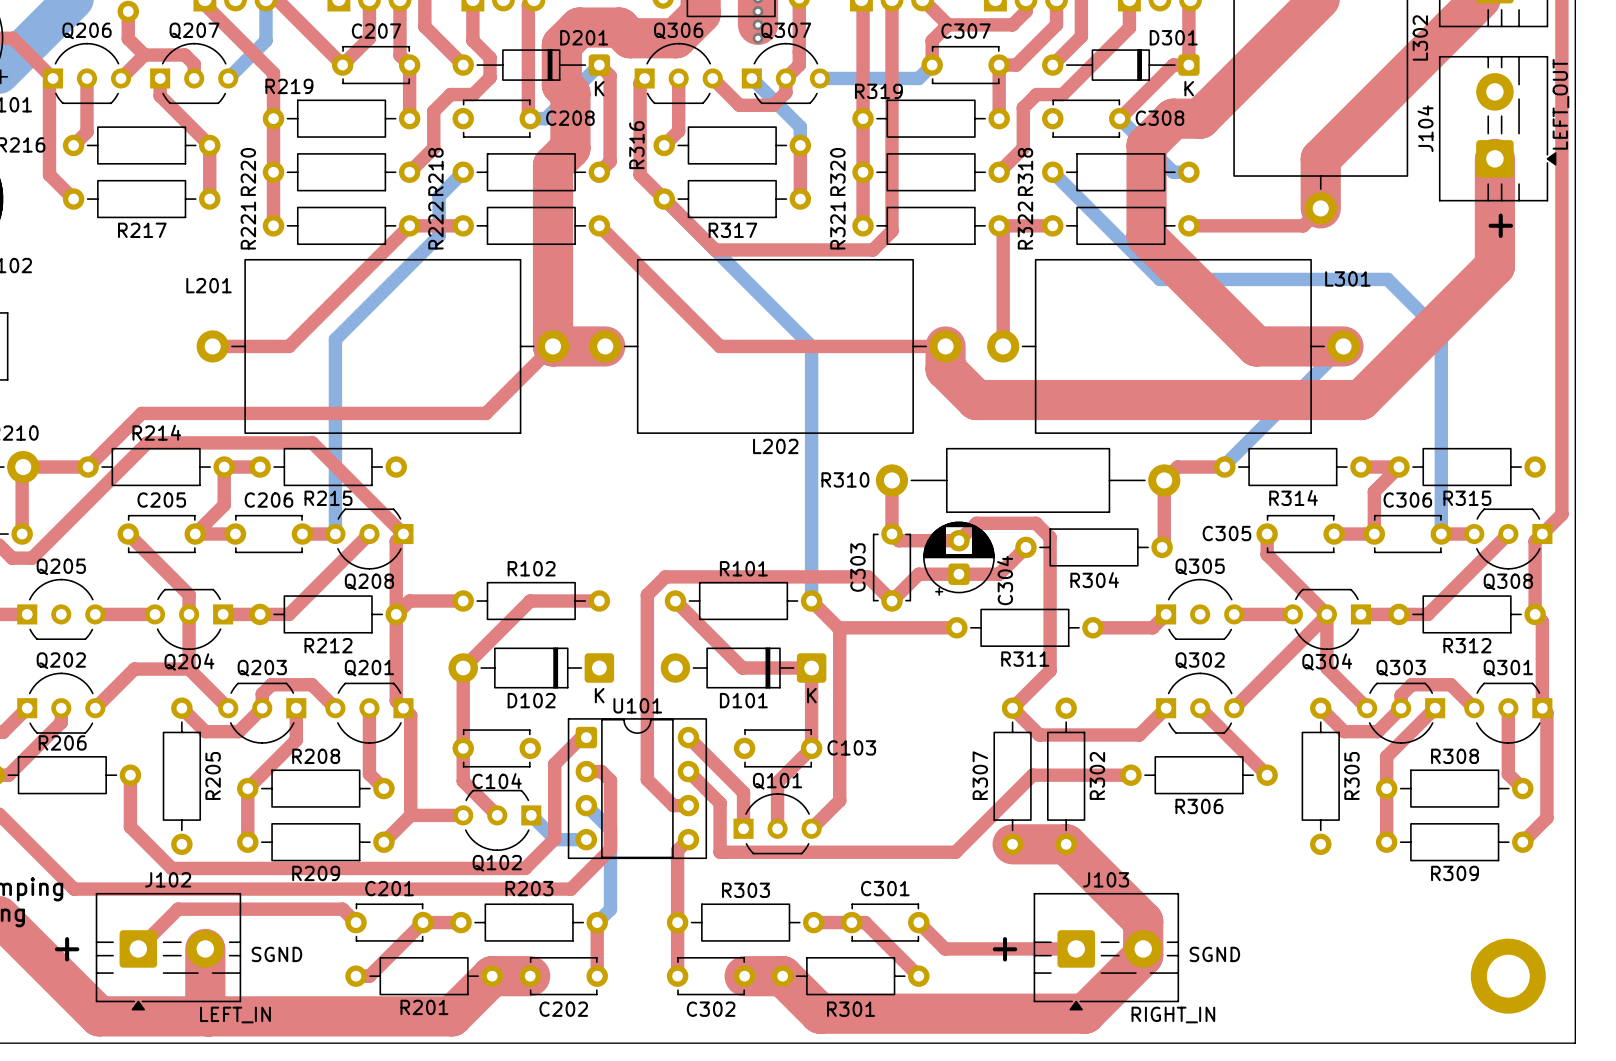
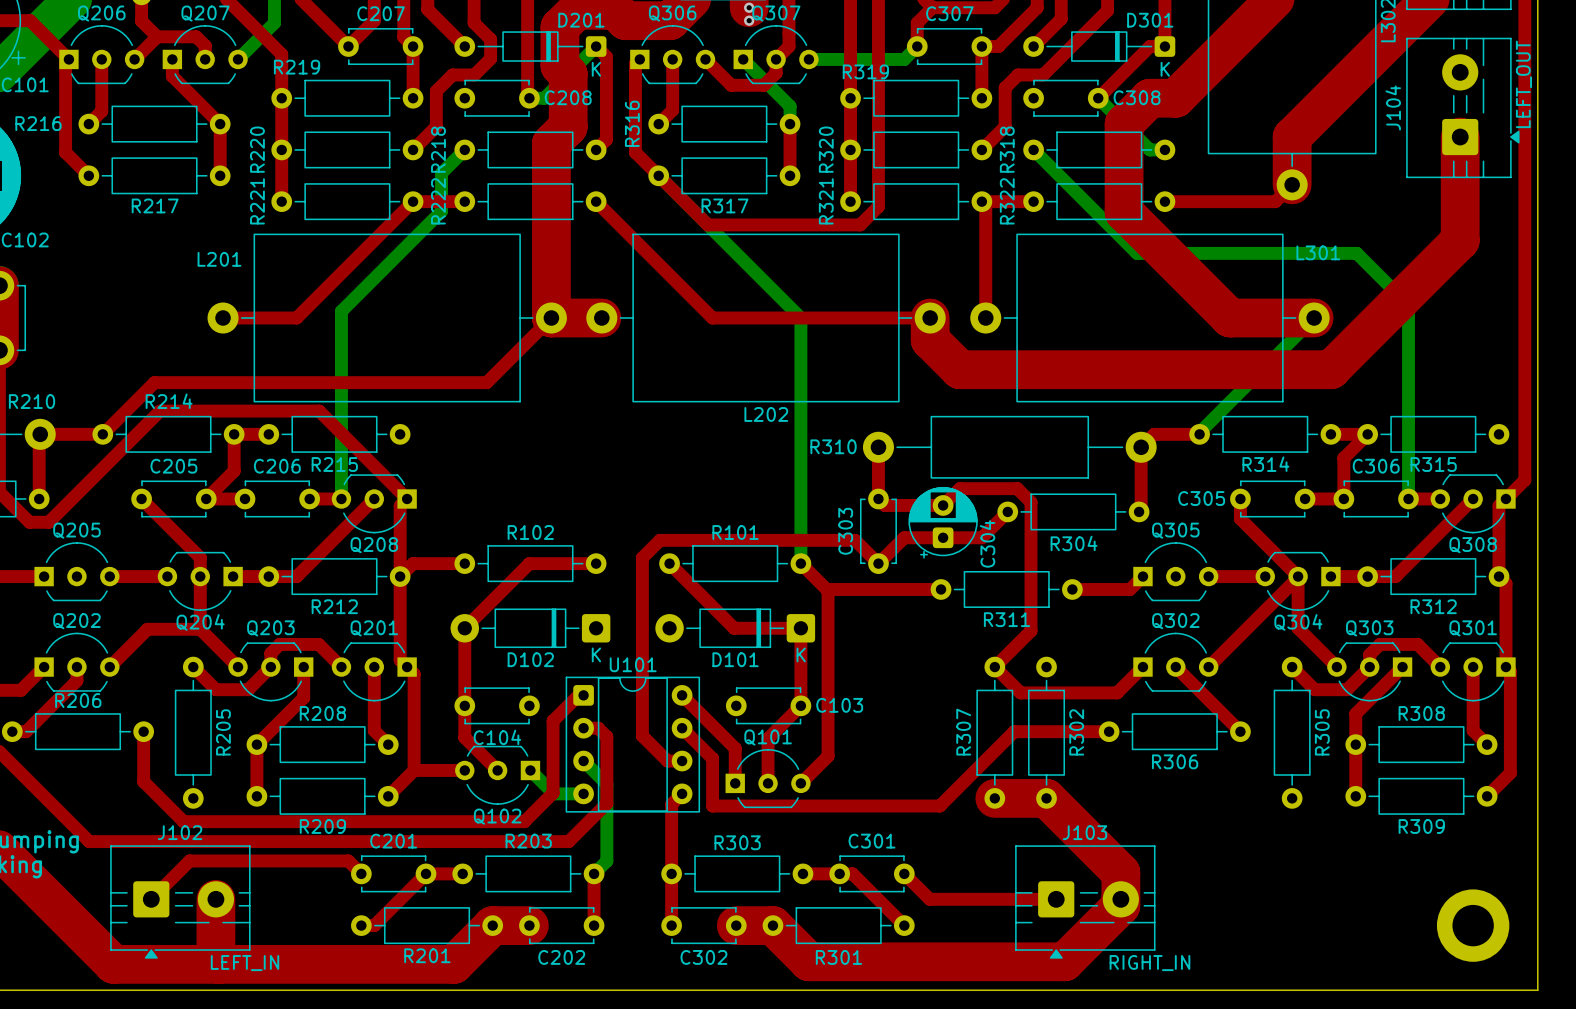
text: + (1500, 225) -> none
text: + (67, 949) -> none
text: + (1005, 949) -> none
text: SGND (276, 954) -> none
text: SGND (1214, 954) -> none

